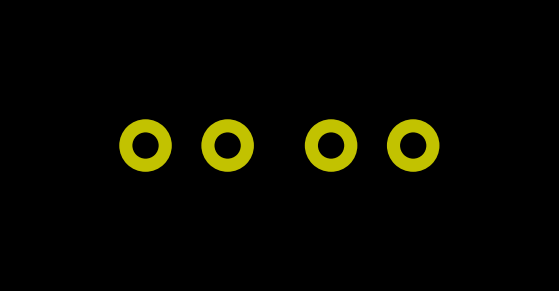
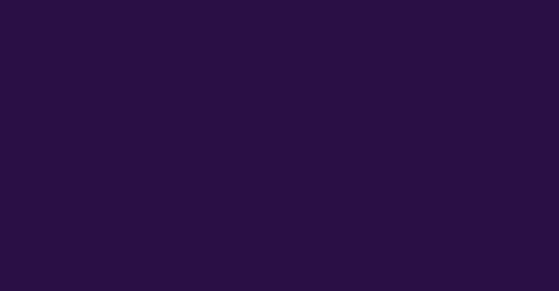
part: (186, 145) -> none
part: (372, 145) -> none

